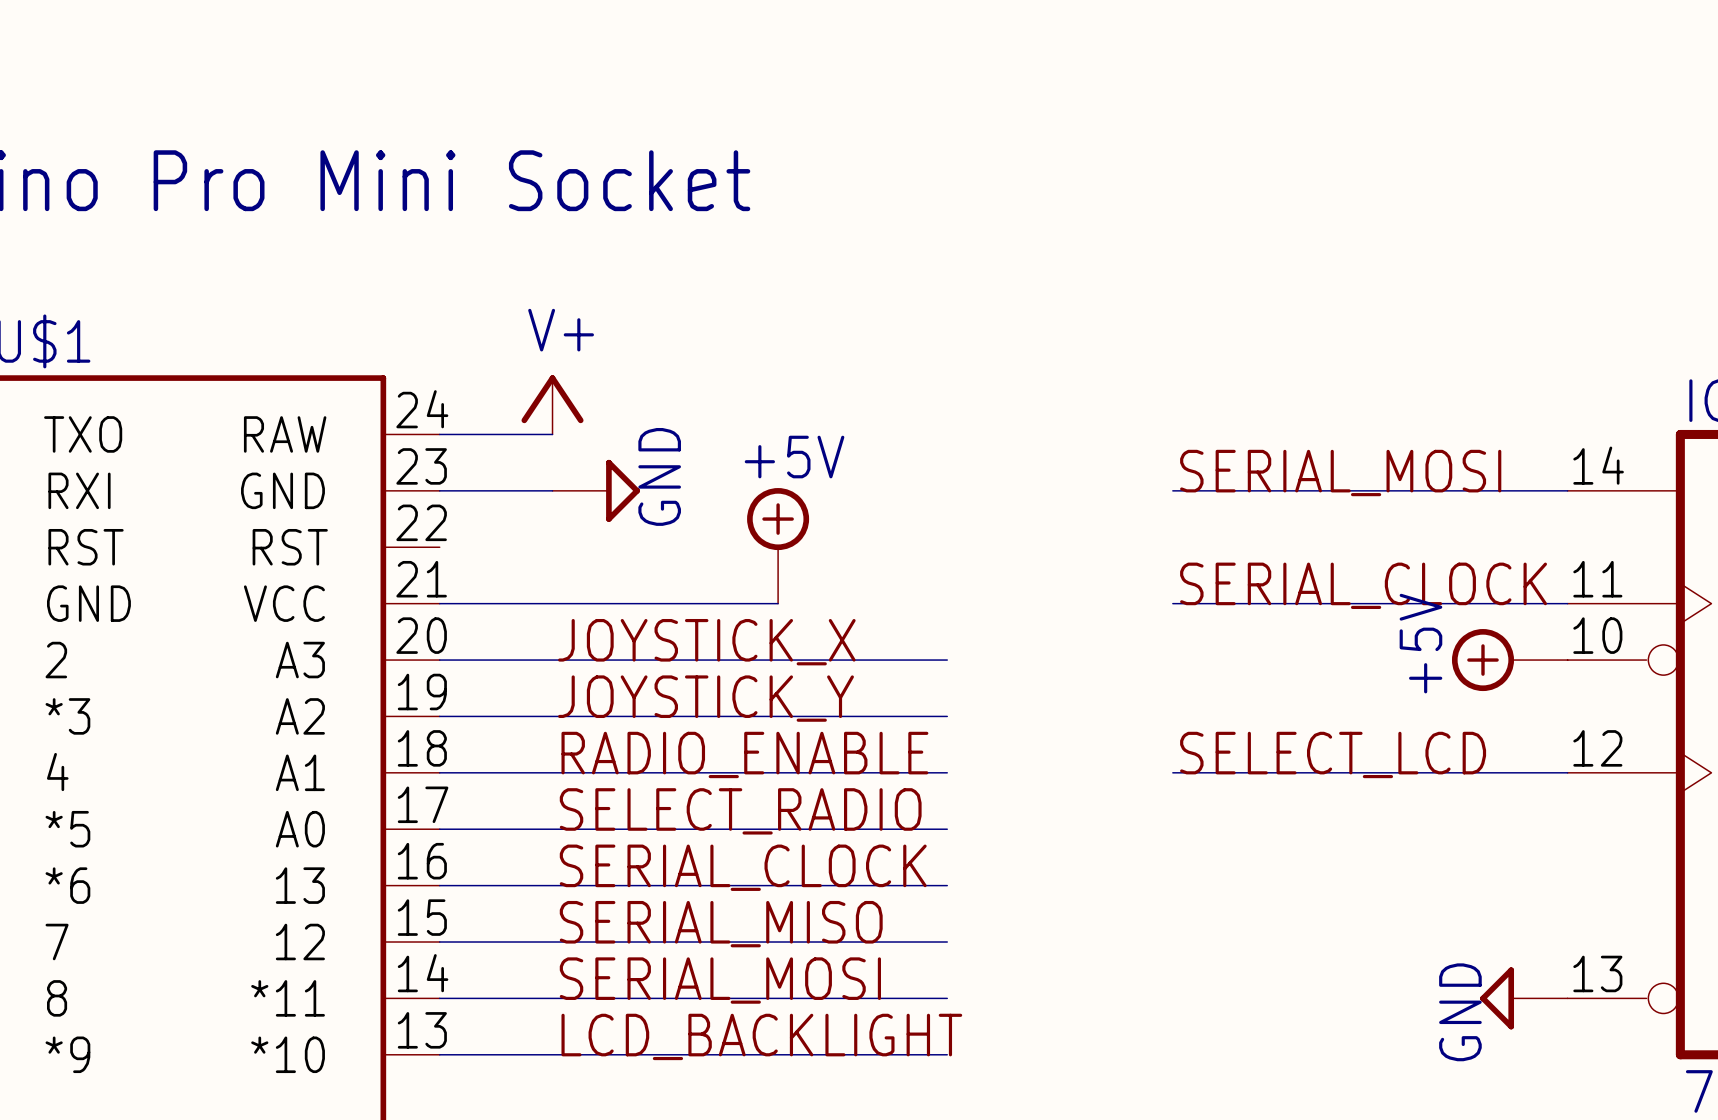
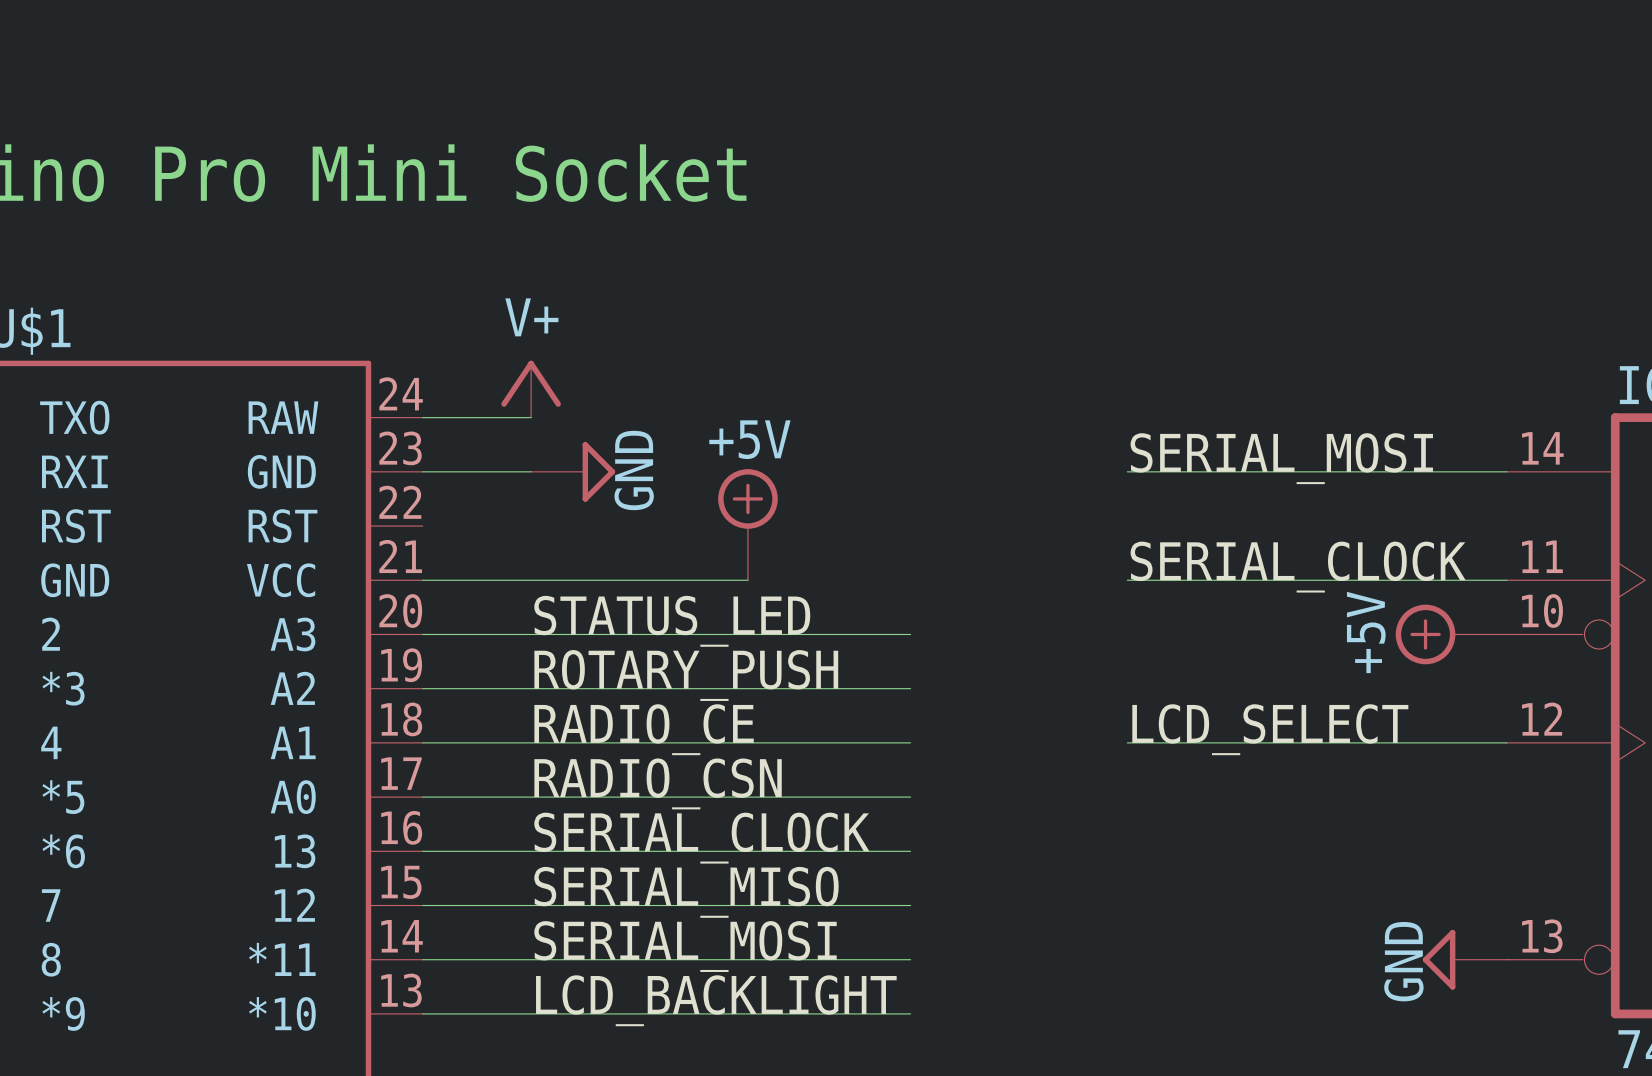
label: JOYSTICK_X (706, 642) -> STATUS_LED (672, 621)
label: JOYSTICK_Y (706, 698) -> ROTARY_PUSH (686, 675)
label: RADIO_ENABLE (744, 754) -> RADIO_CE (644, 729)
label: SELECT_LCD (1333, 754) -> LCD_SELECT (1270, 729)
label: SELECT_RADIO (740, 811) -> RADIO_CSN (658, 783)

